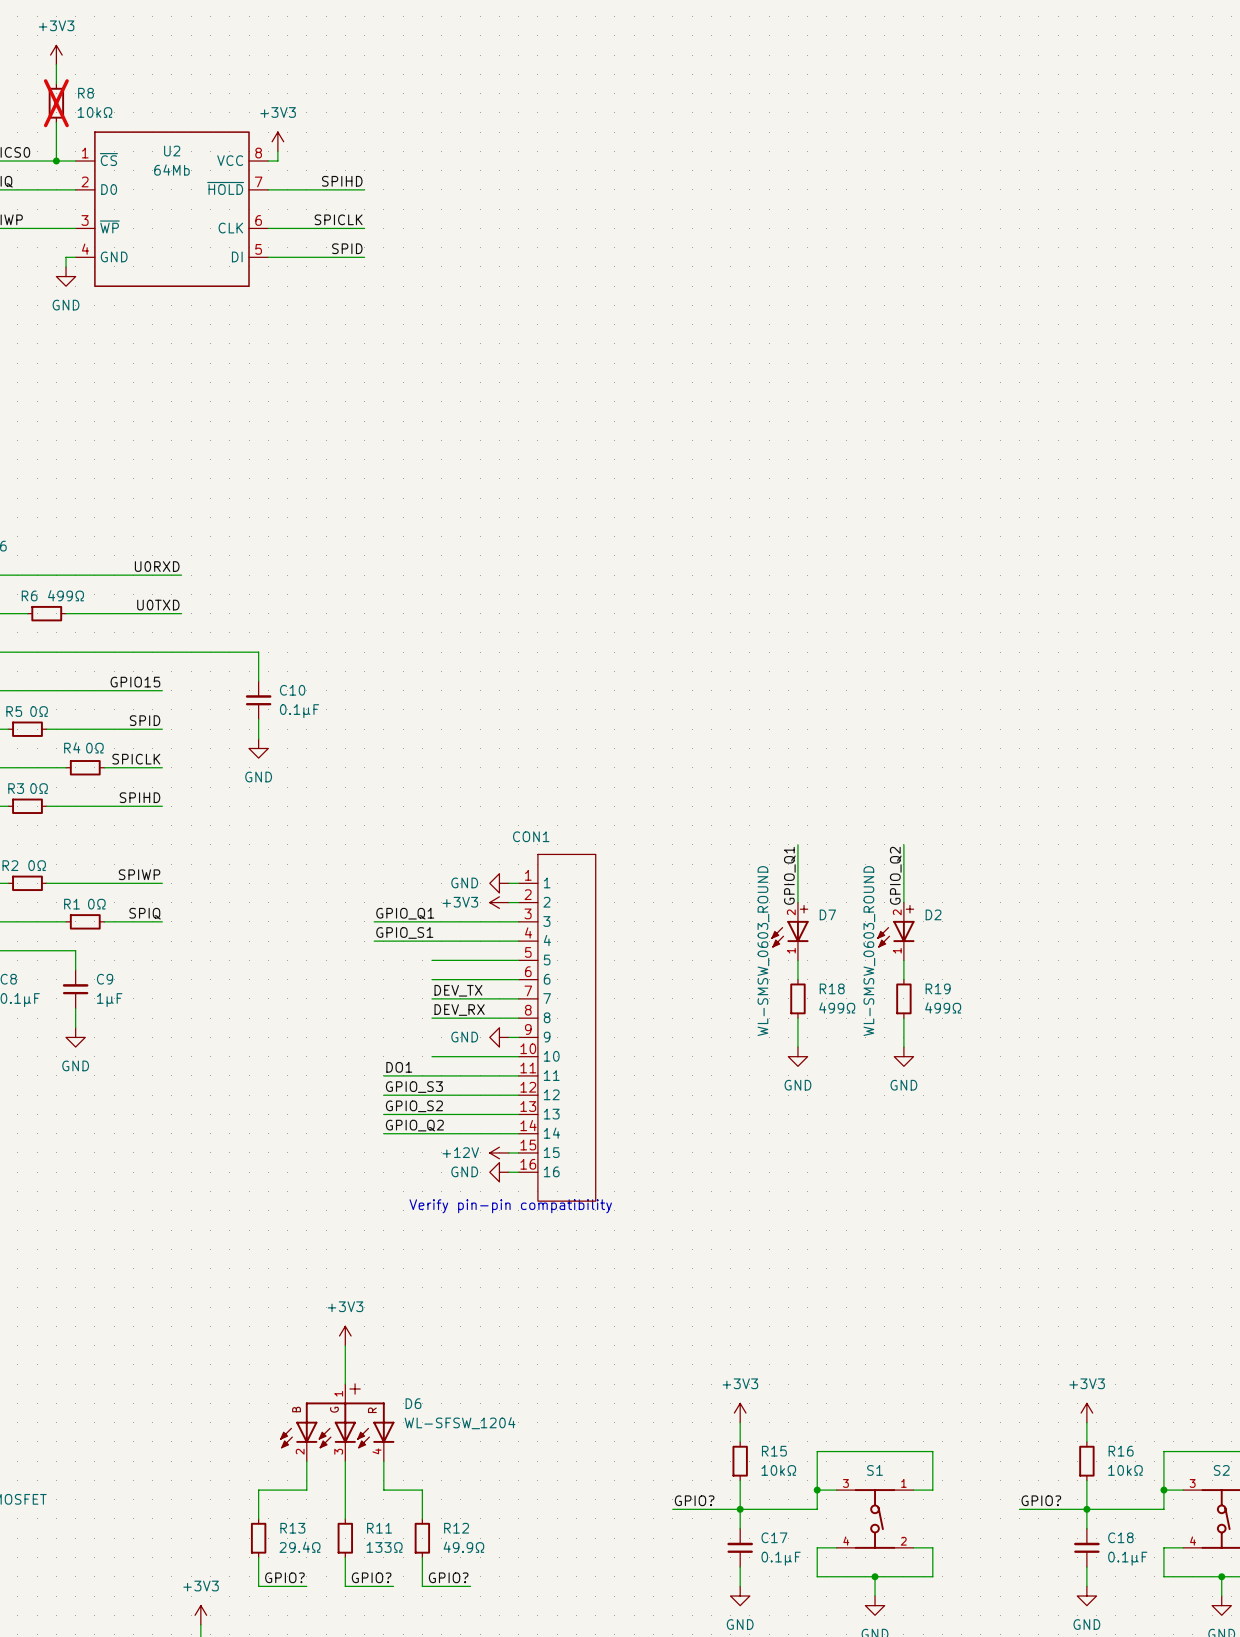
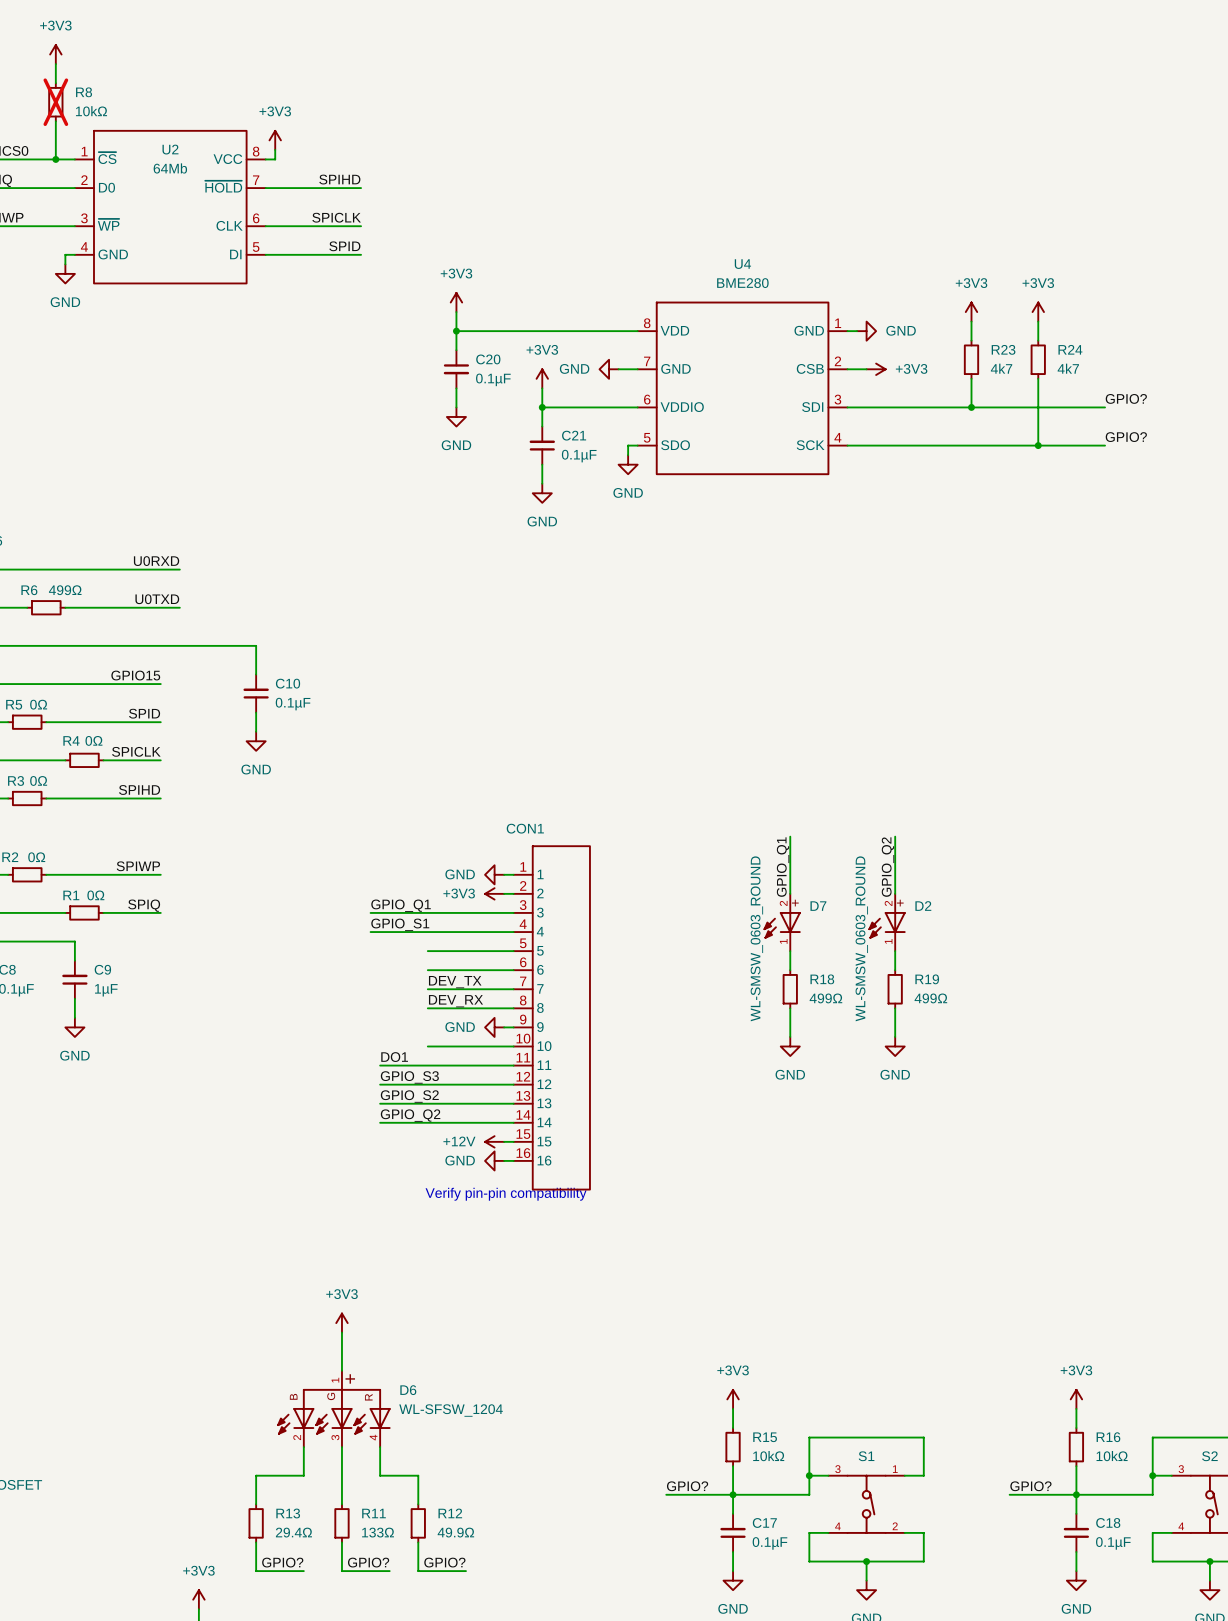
power symbol: none -> +3V3 (456, 302)
wire: none -> (456, 312) (456, 350)
power symbol: none -> +3V3 (971, 312)
power symbol: none -> +3V3 (1038, 312)
wire: none -> (971, 321) (971, 340)
wire: none -> (1038, 321) (1038, 340)
wire: none -> (456, 331) (637, 331)
junction: none -> (456, 331)
wire: none -> (847, 331) (857, 331)
power symbol: none -> GND (866, 331)
R23: none -> (971, 359)
R24: none -> (1038, 359)
C20: none -> (456, 369)
power symbol: none -> GND (609, 369)
wire: none -> (618, 369) (637, 369)
wire: none -> (847, 369) (866, 369)
power symbol: none -> +3V3 (876, 369)
power symbol: none -> +3V3 (542, 378)
wire: none -> (971, 378) (971, 407)
wire: none -> (1038, 378) (1038, 445)
wire: none -> (456, 388) (456, 407)
wire: none -> (542, 388) (542, 426)
U4: none -> (742, 388)
label: none -> GPIO? (1126, 398)
wire: none -> (542, 407) (637, 407)
junction: none -> (542, 407)
wire: none -> (847, 407) (1105, 407)
junction: none -> (971, 407)
power symbol: none -> GND (456, 416)
label: none -> GPIO? (1126, 437)
C21: none -> (542, 445)
wire: none -> (637, 445) (628, 445) (628, 455)
wire: none -> (847, 445) (1105, 445)
junction: none -> (1038, 445)
wire: none -> (542, 464) (542, 483)
power symbol: none -> GND (628, 464)
power symbol: none -> GND (542, 493)

